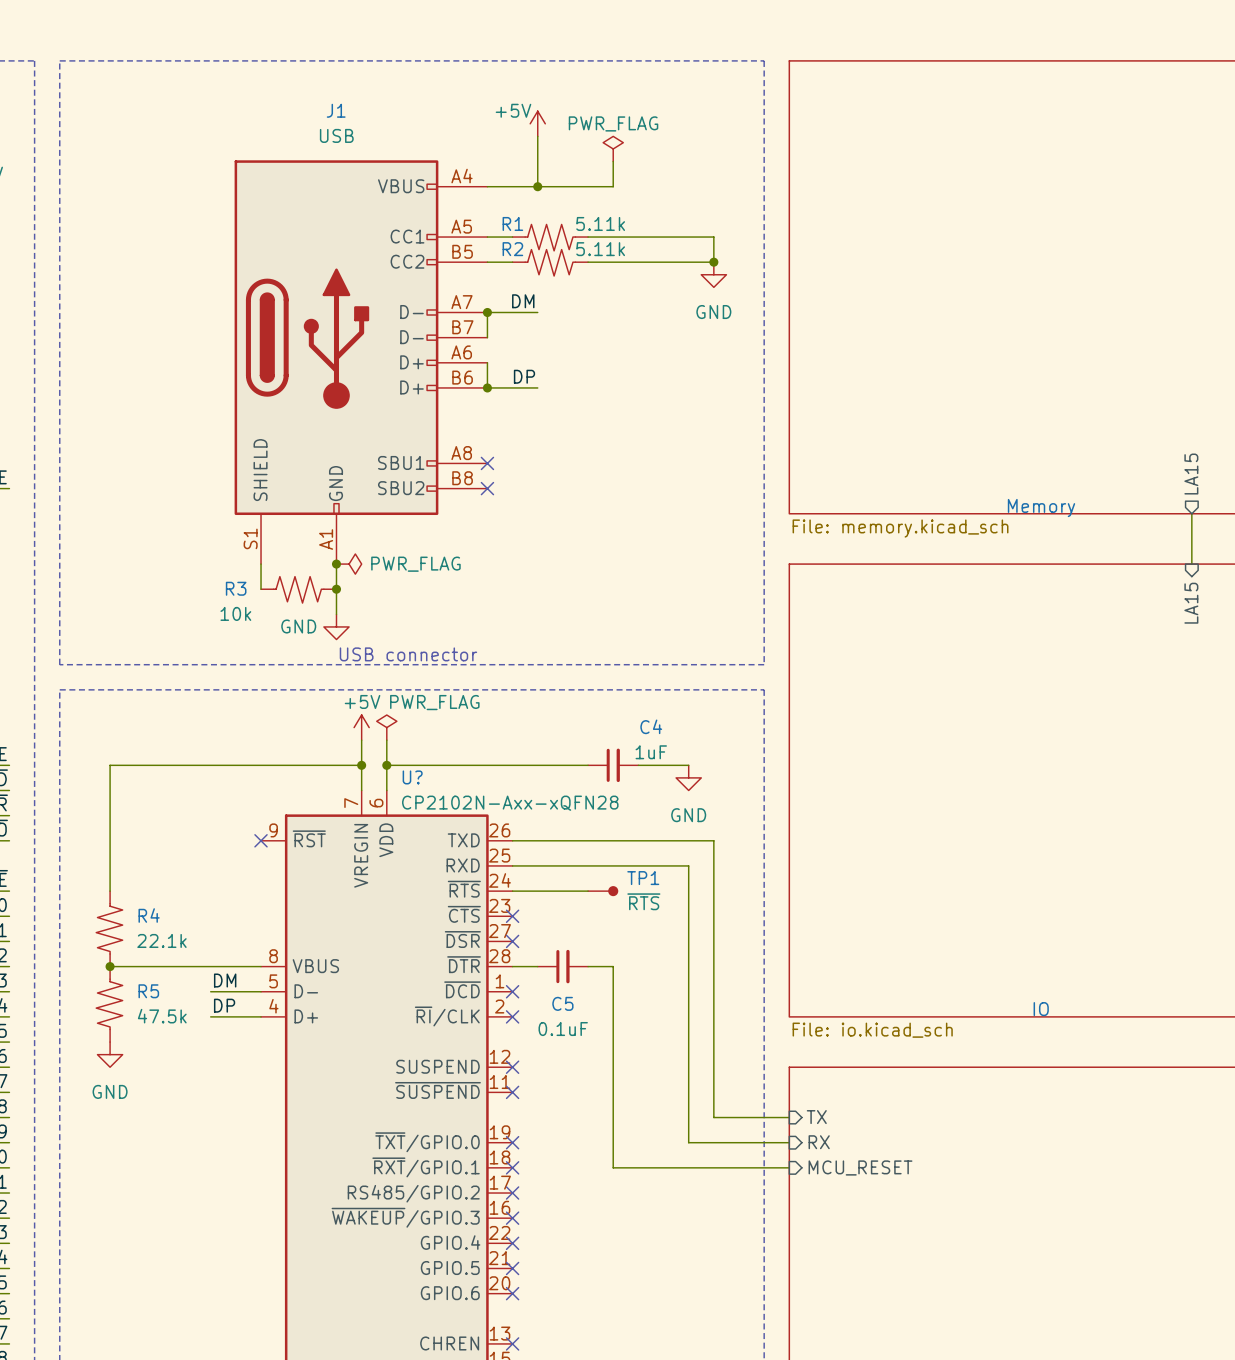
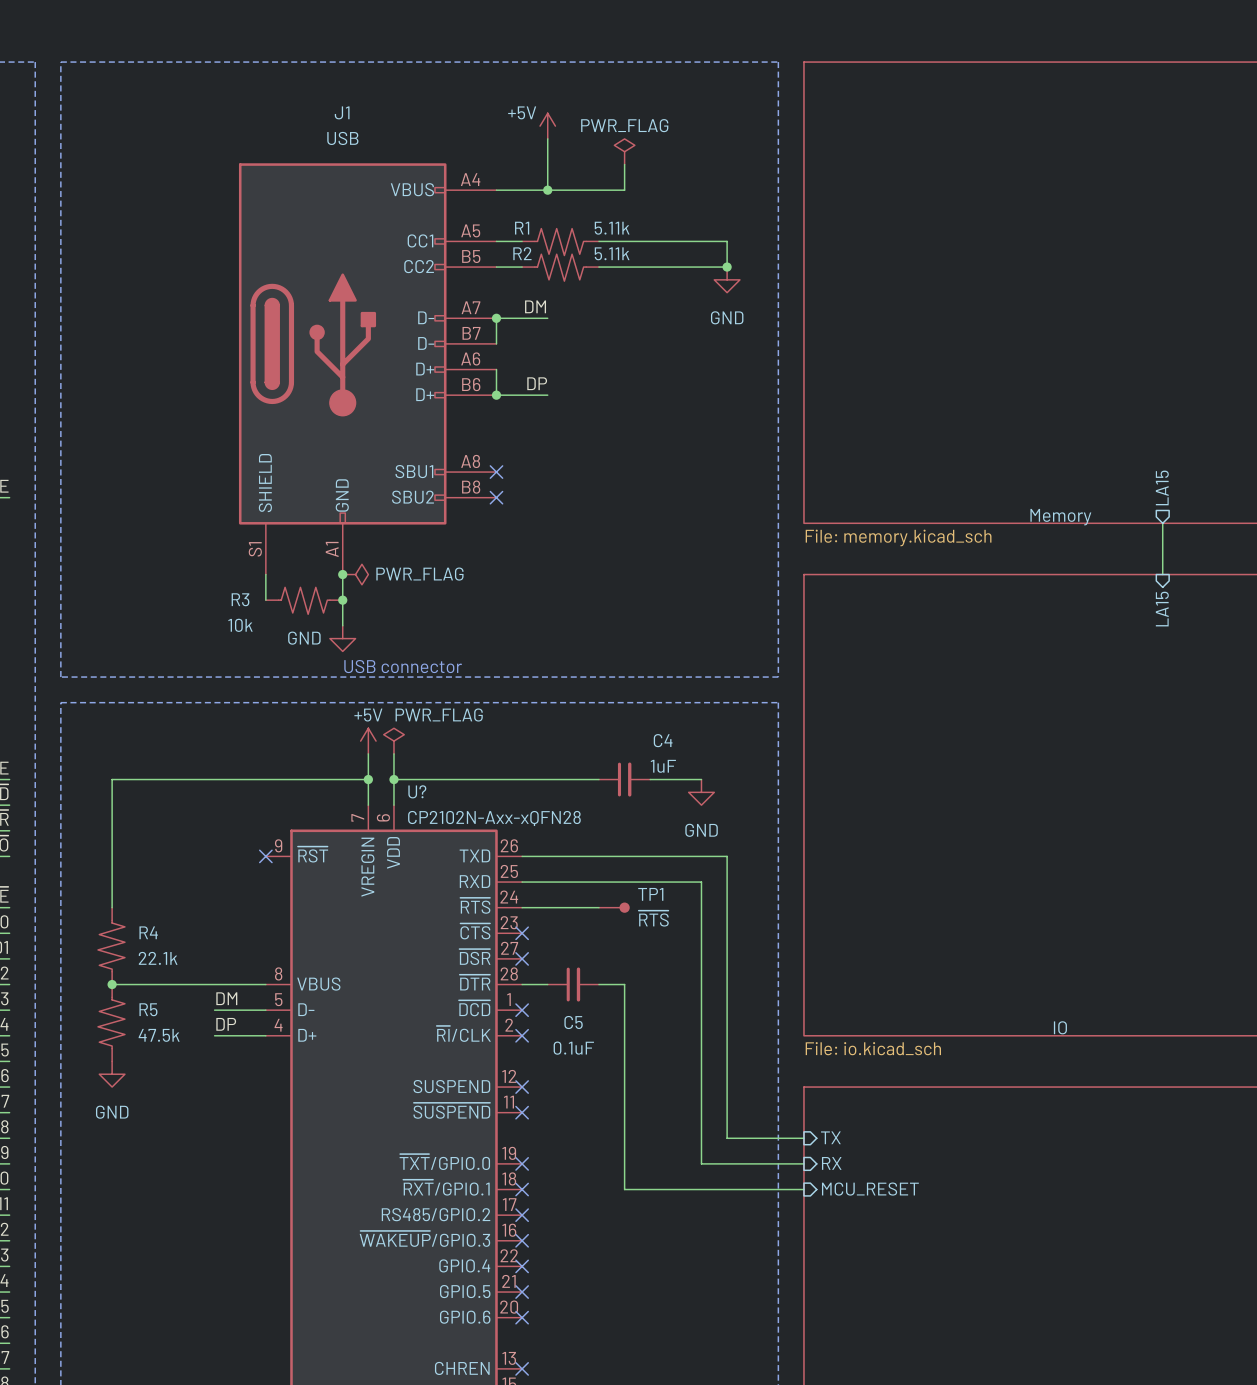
sheet pin: none -> LA15 (1162, 487)
sheet pin: LA15 (1191, 474) -> none
wire: (1191, 513) (1191, 564) -> (1162, 523) (1162, 574)
sheet pin: none -> LA15 (1162, 609)
sheet pin: LA15 (1191, 603) -> none

